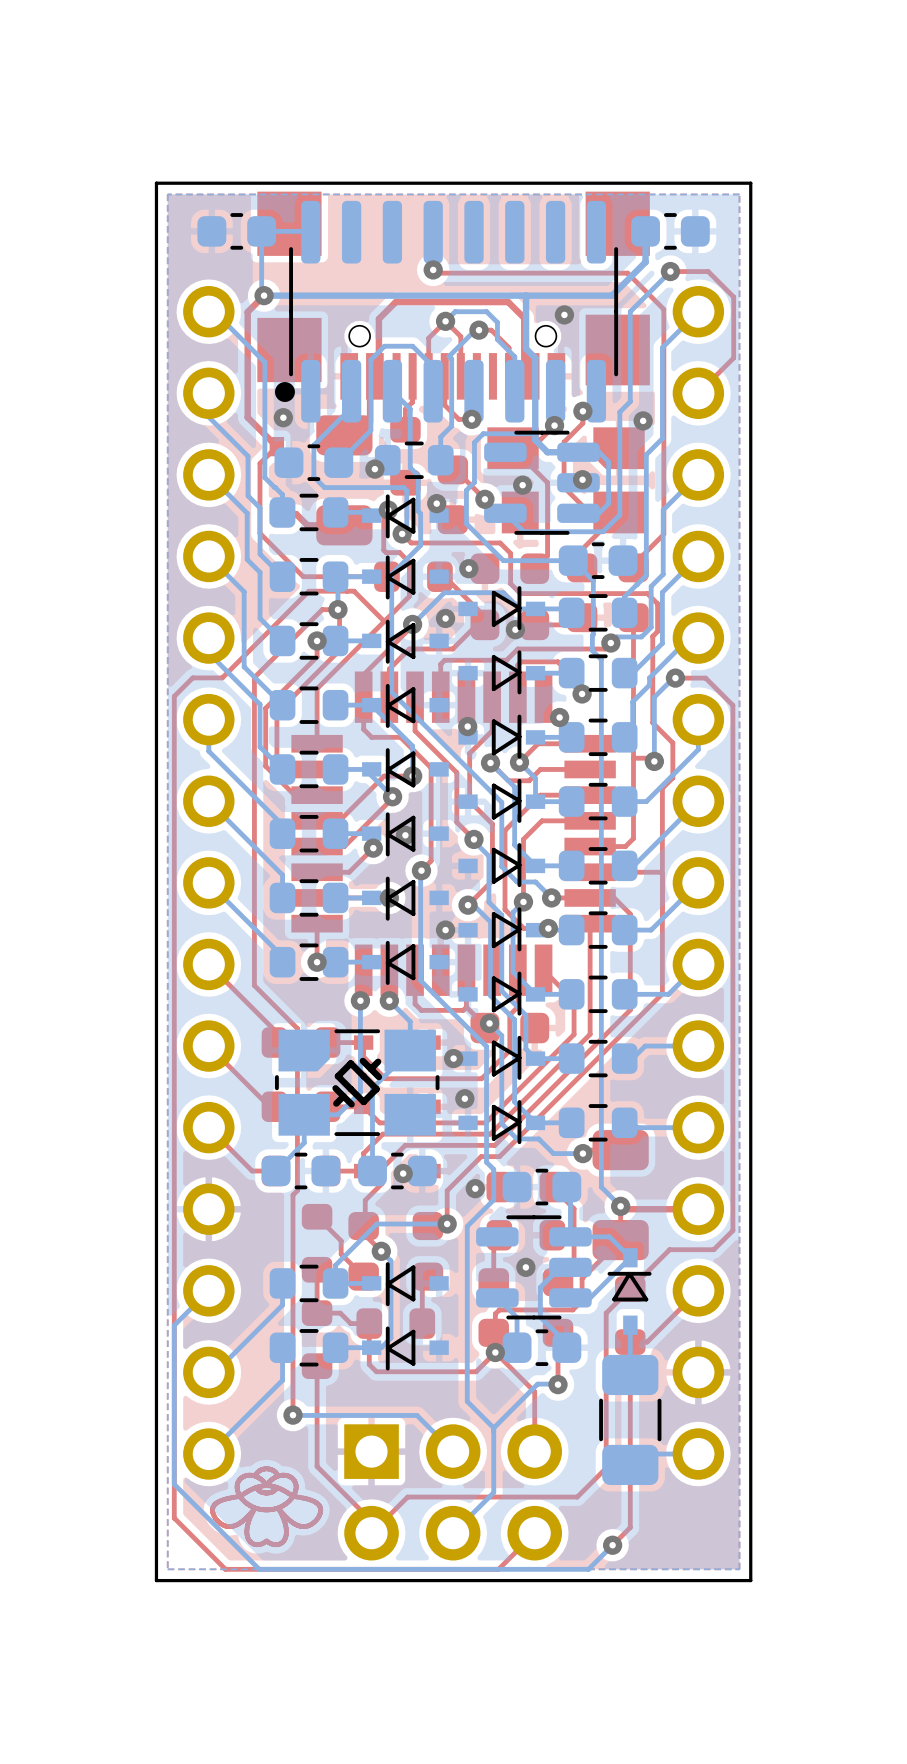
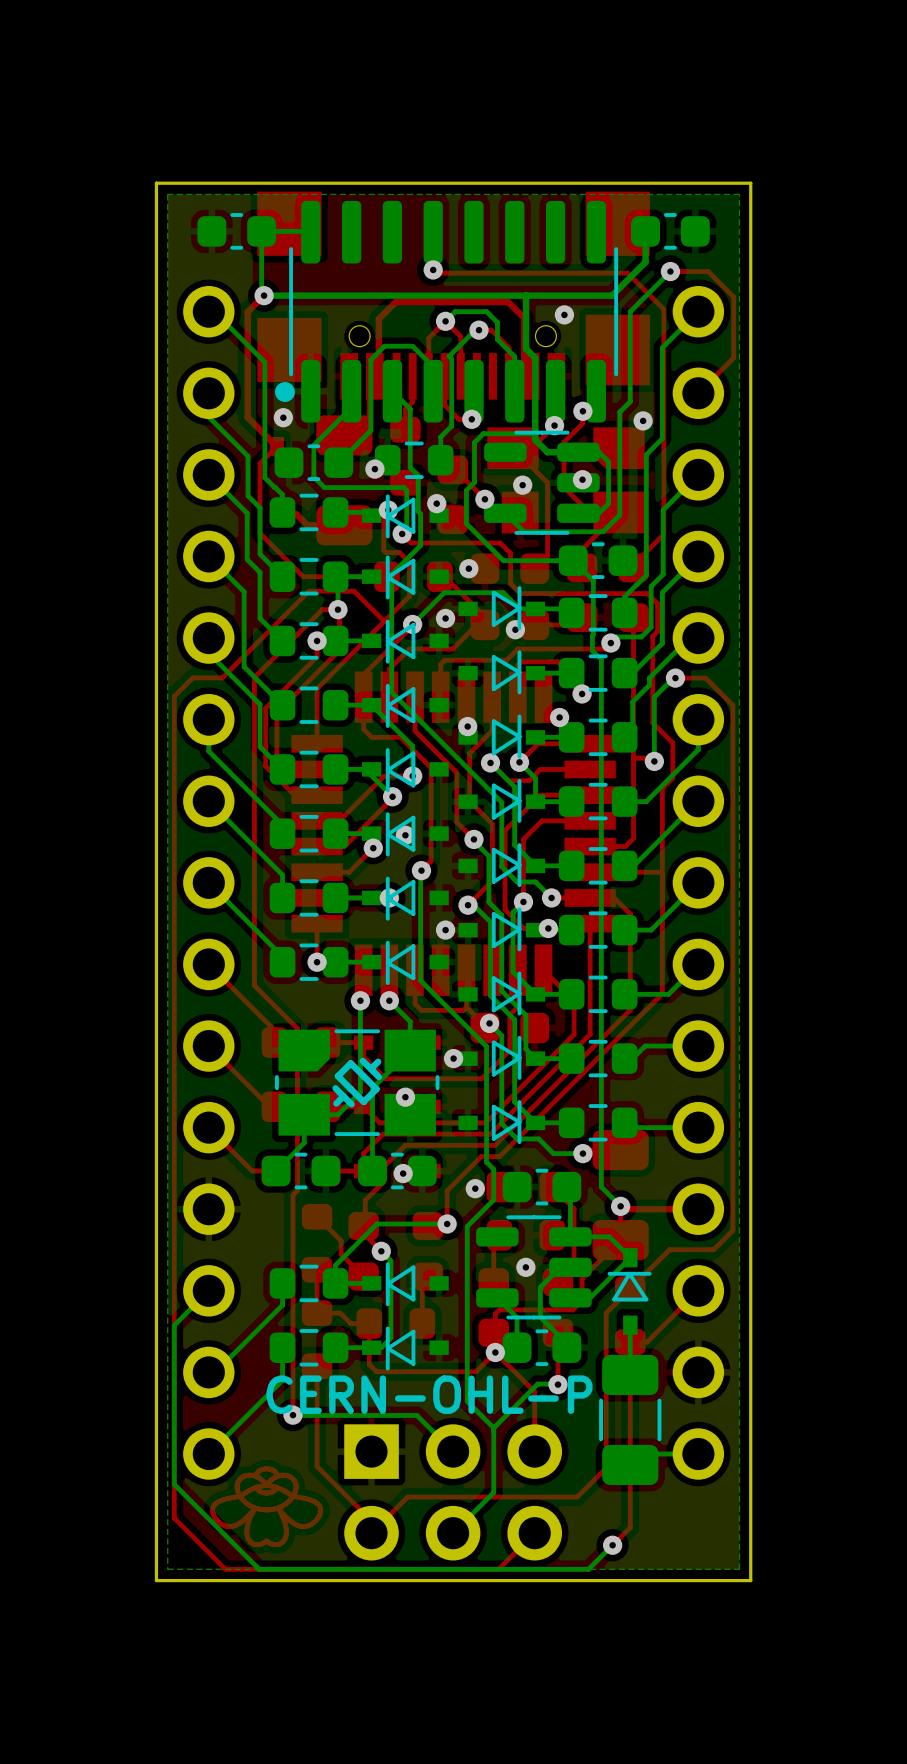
via position: (464, 1098) -> (405, 1097)
text: none -> CERN-OHL-P (429, 1394)

